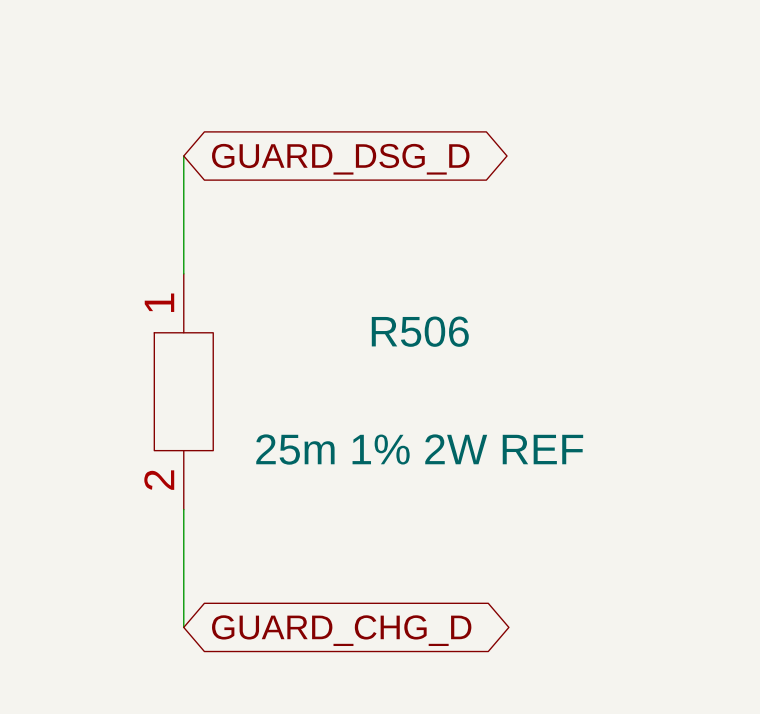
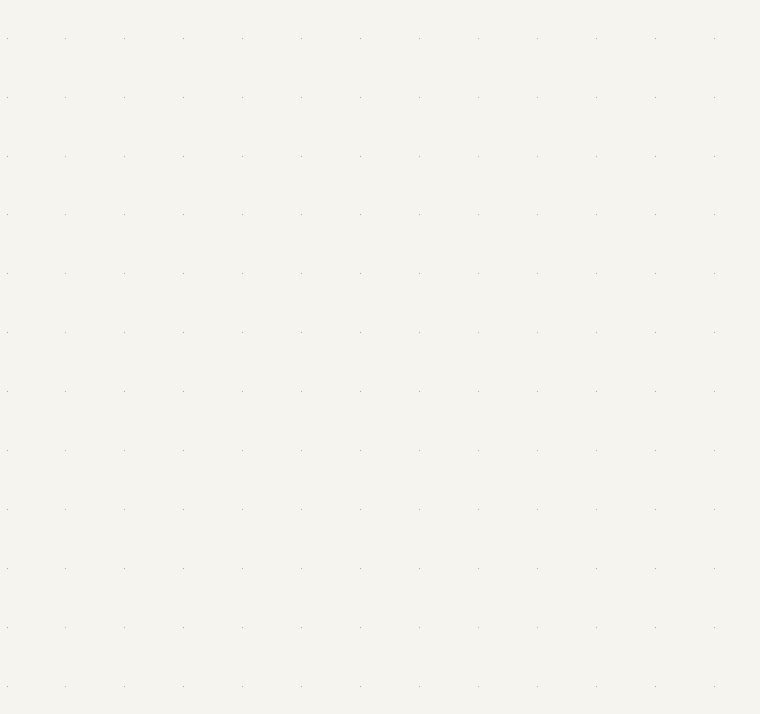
wire: (183, 156) (183, 273) -> none
global label: GUARD_DSG_D (340, 159) -> none
R506: 25m 1% 2W REF (183, 391) -> none
wire: (183, 509) (183, 627) -> none
global label: GUARD_CHG_D (341, 630) -> none

